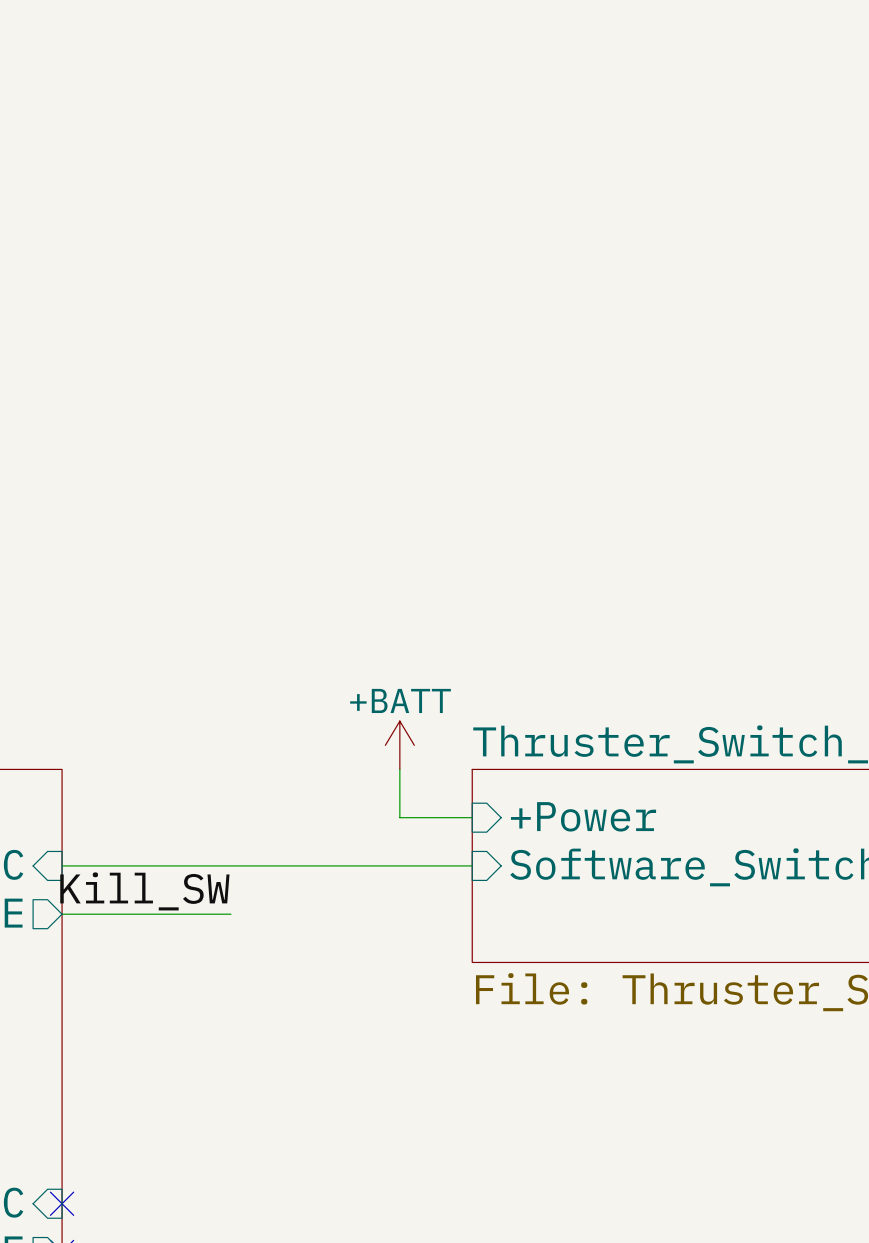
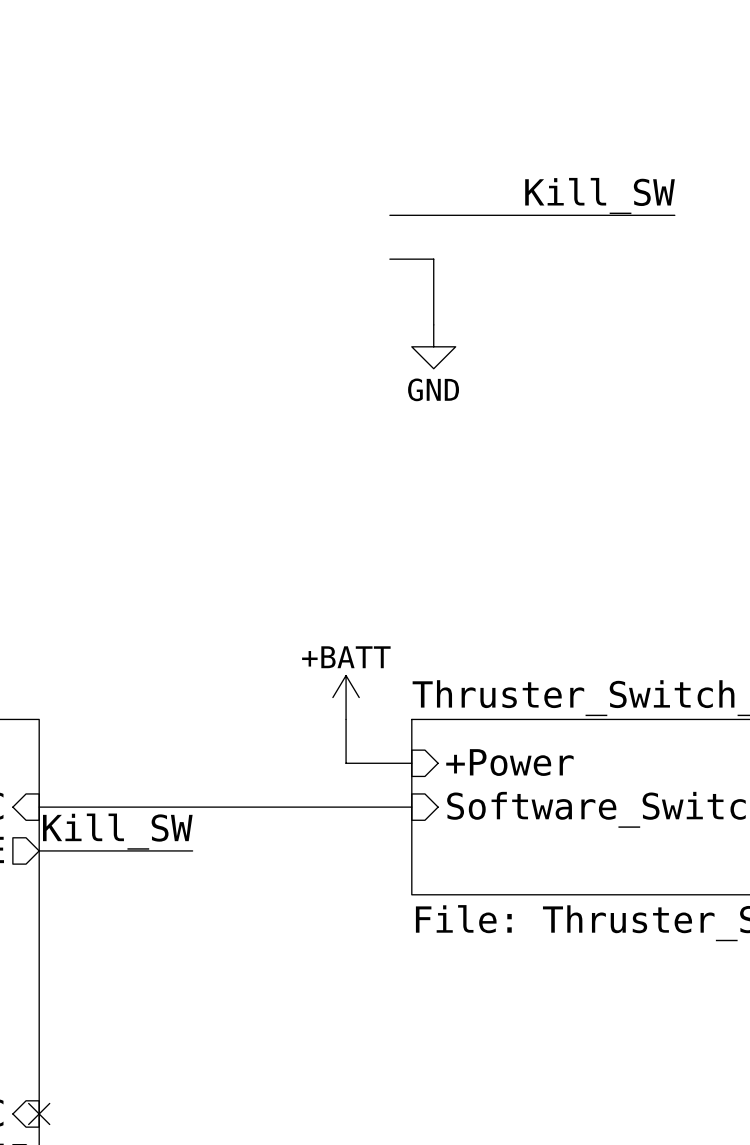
label: none -> Kill_SW (600, 195)
wire: none -> (389, 215) (674, 215)
wire: none -> (389, 259) (433, 259) (433, 324)
power symbol: none -> GND (433, 346)

